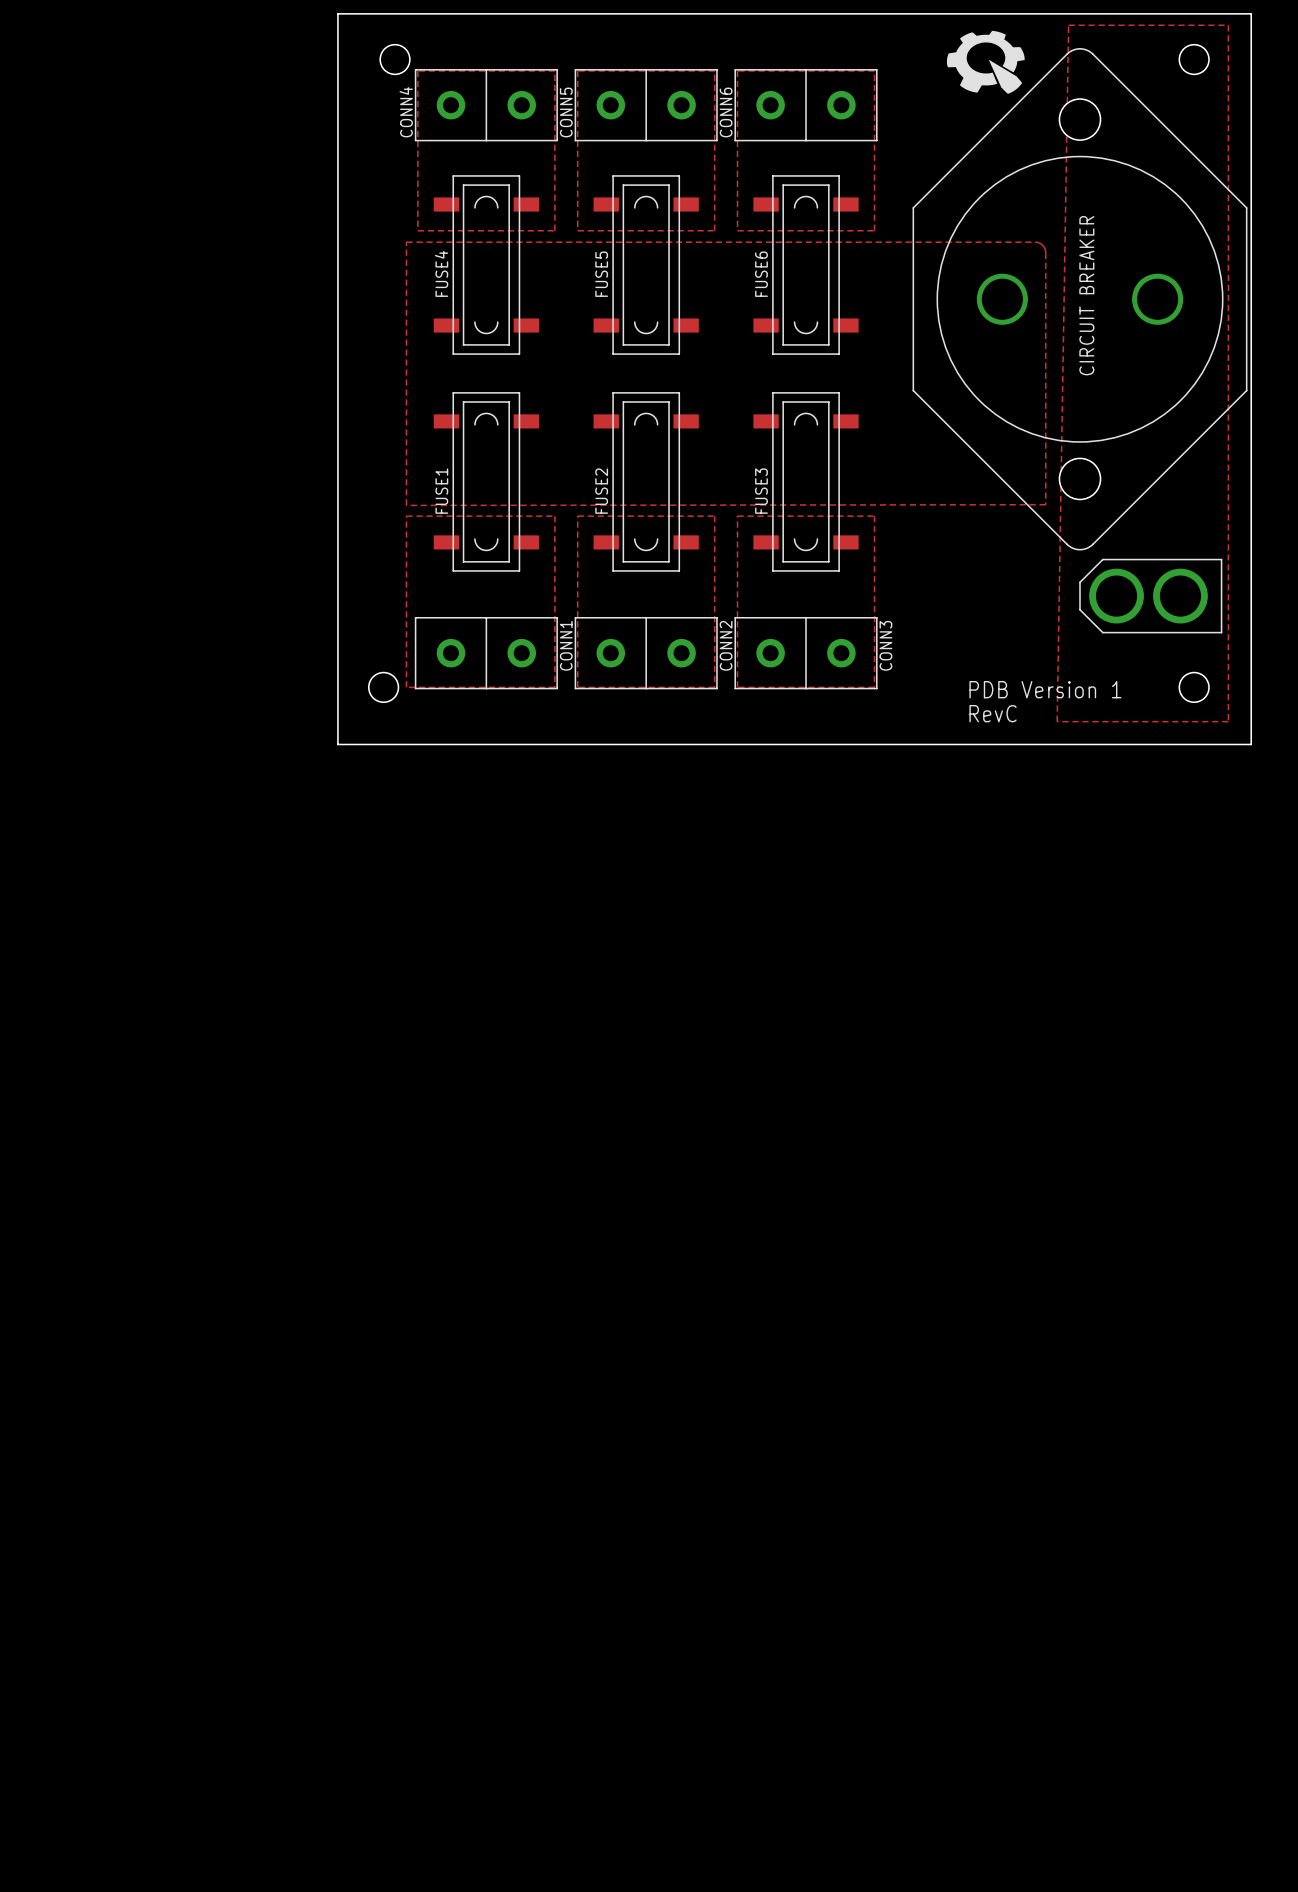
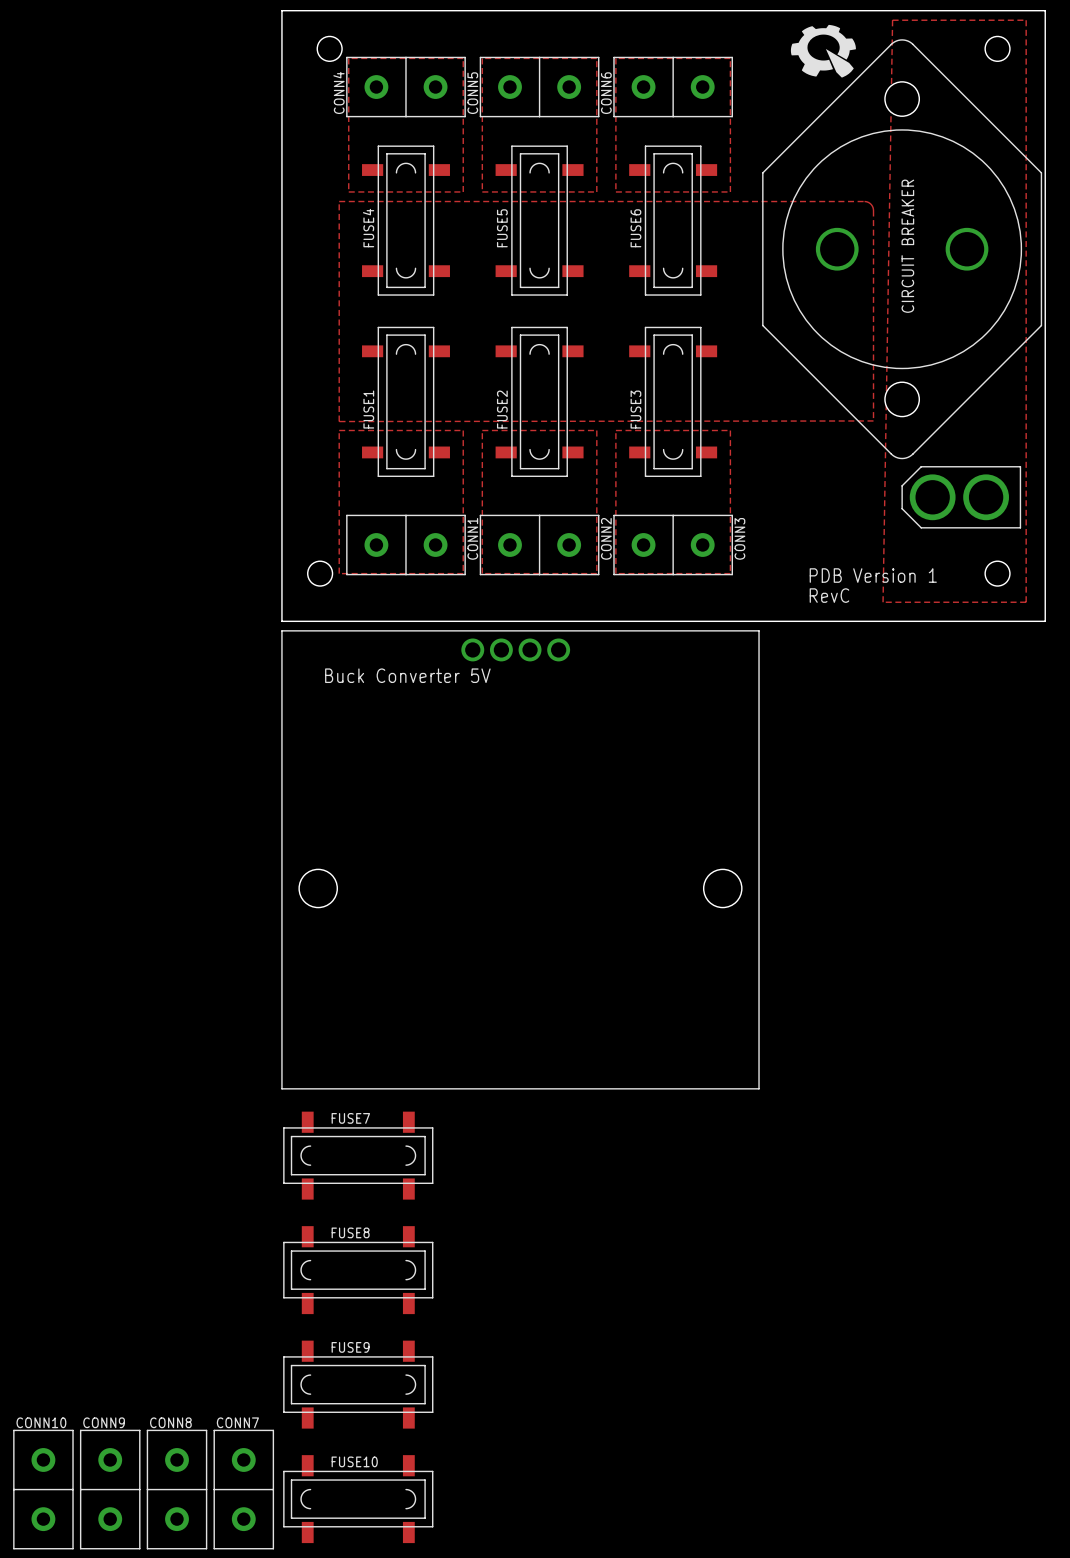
part: none -> (520, 859)
FUSE7: none -> (358, 1155)
FUSE8: none -> (358, 1270)
FUSE9: none -> (358, 1384)
CONN10: none -> (43, 1489)
CONN9: none -> (110, 1489)
CONN8: none -> (177, 1489)
CONN7: none -> (243, 1489)
FUSE10: none -> (358, 1499)

